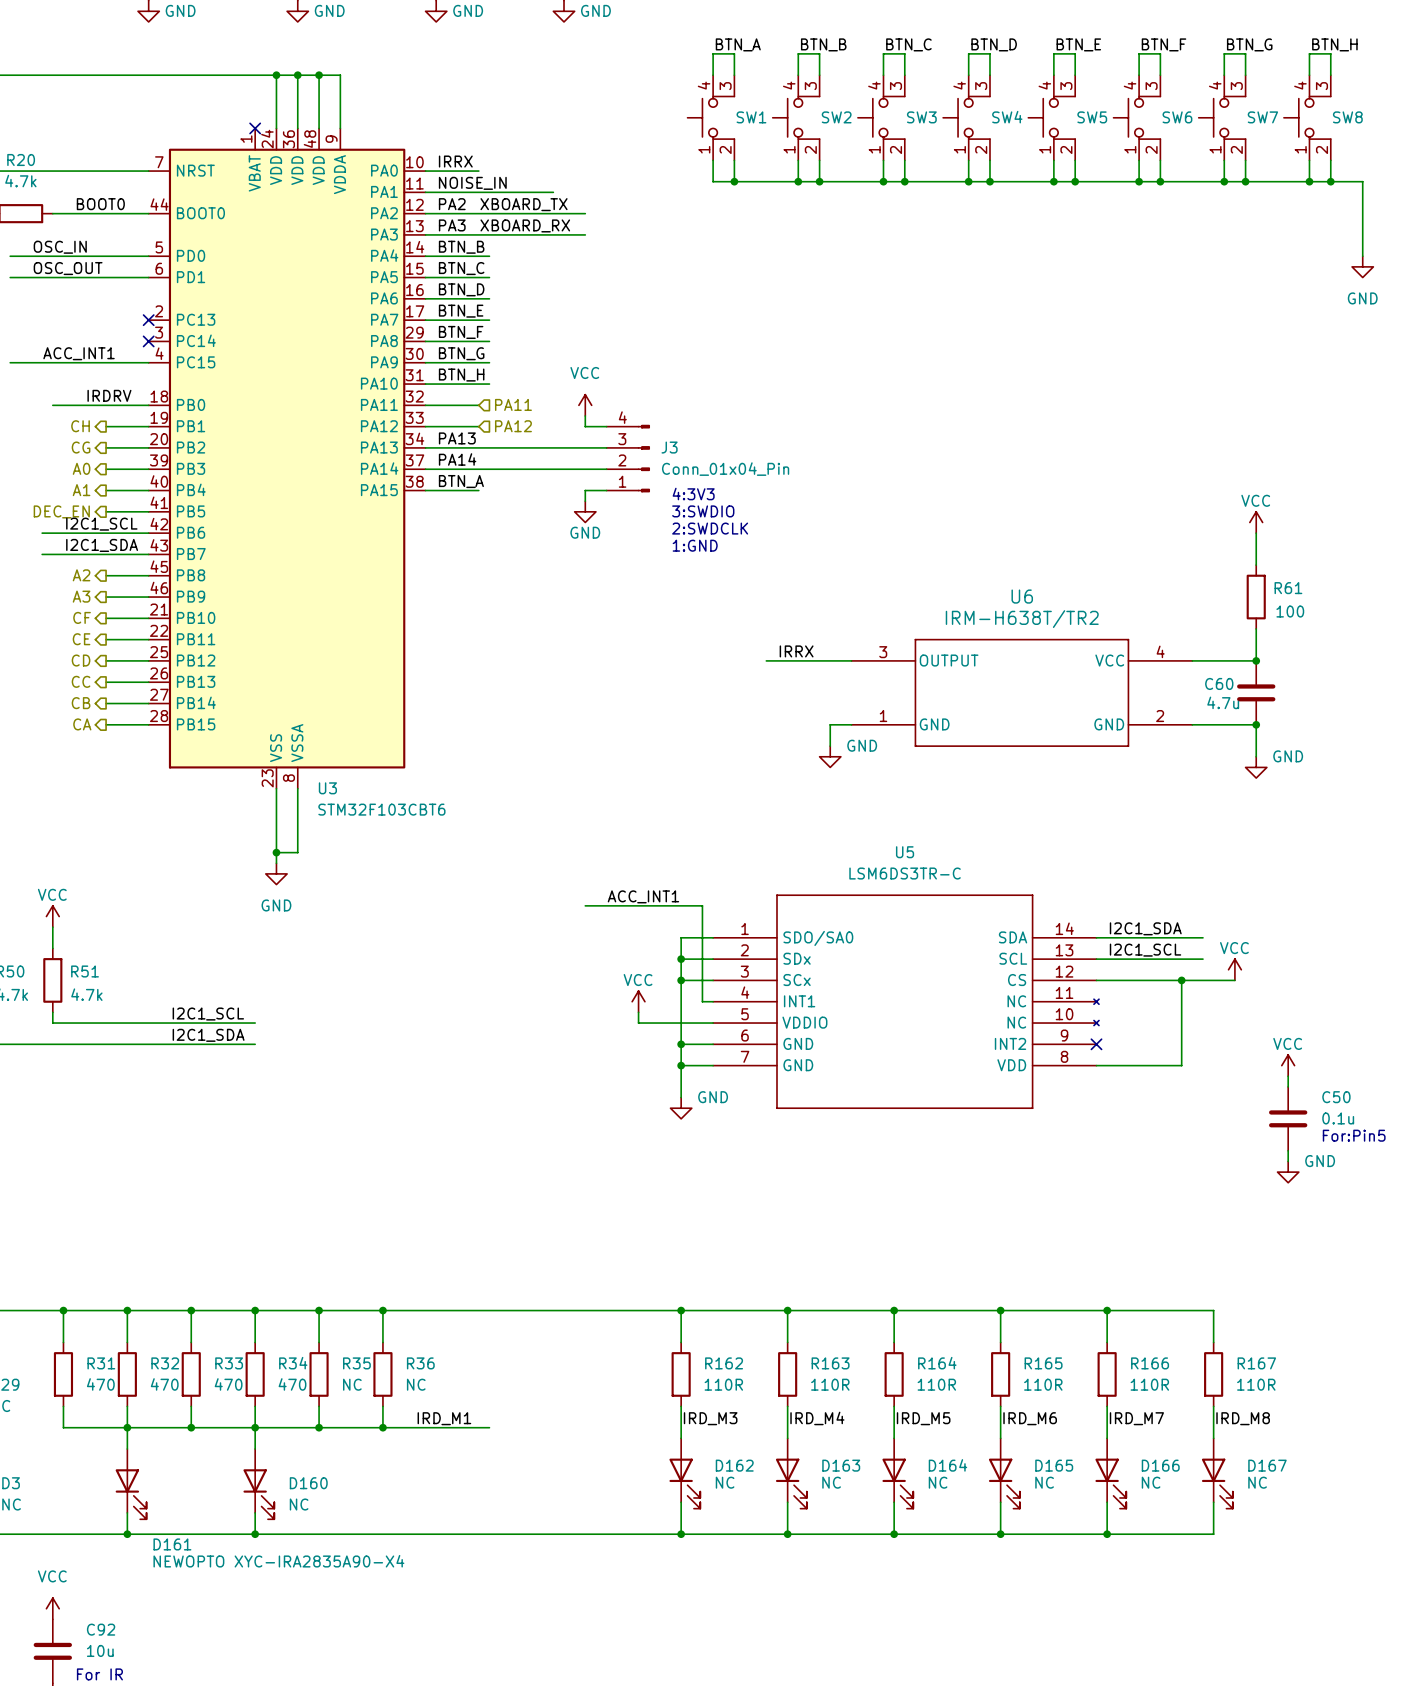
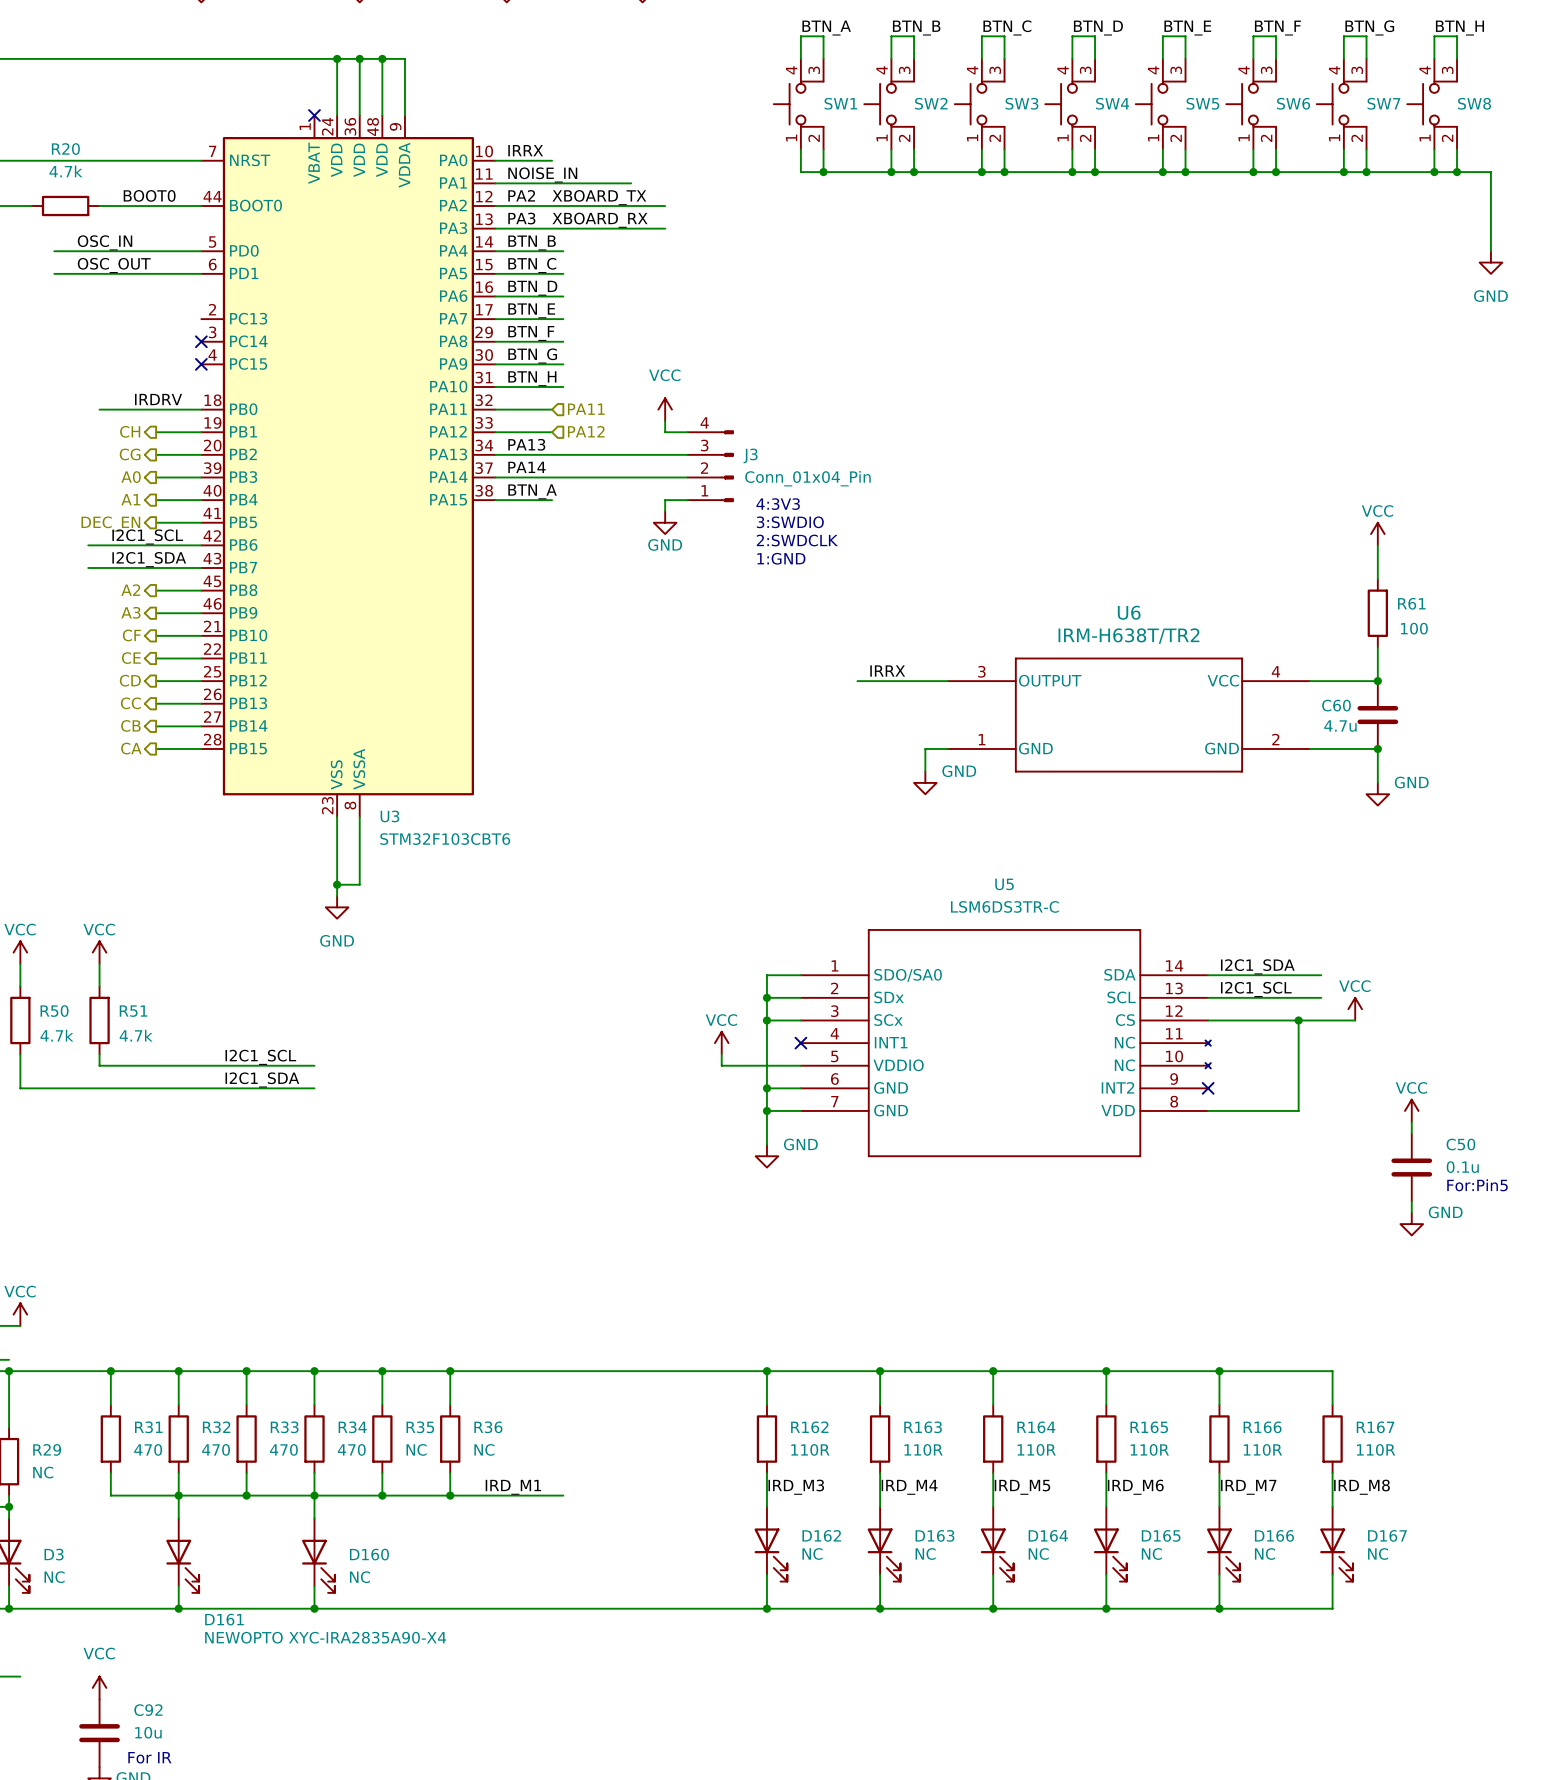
no-connect mark position: (148, 320) -> (201, 364)
label: ACC_INT1 (79, 353) -> none
wire: (10, 362) (148, 362) -> none
label: ACC_INT1 (643, 896) -> none
wire: (585, 905) (702, 905) (702, 1001) (713, 1001) -> none
no-connect mark: none -> (800, 1043)

